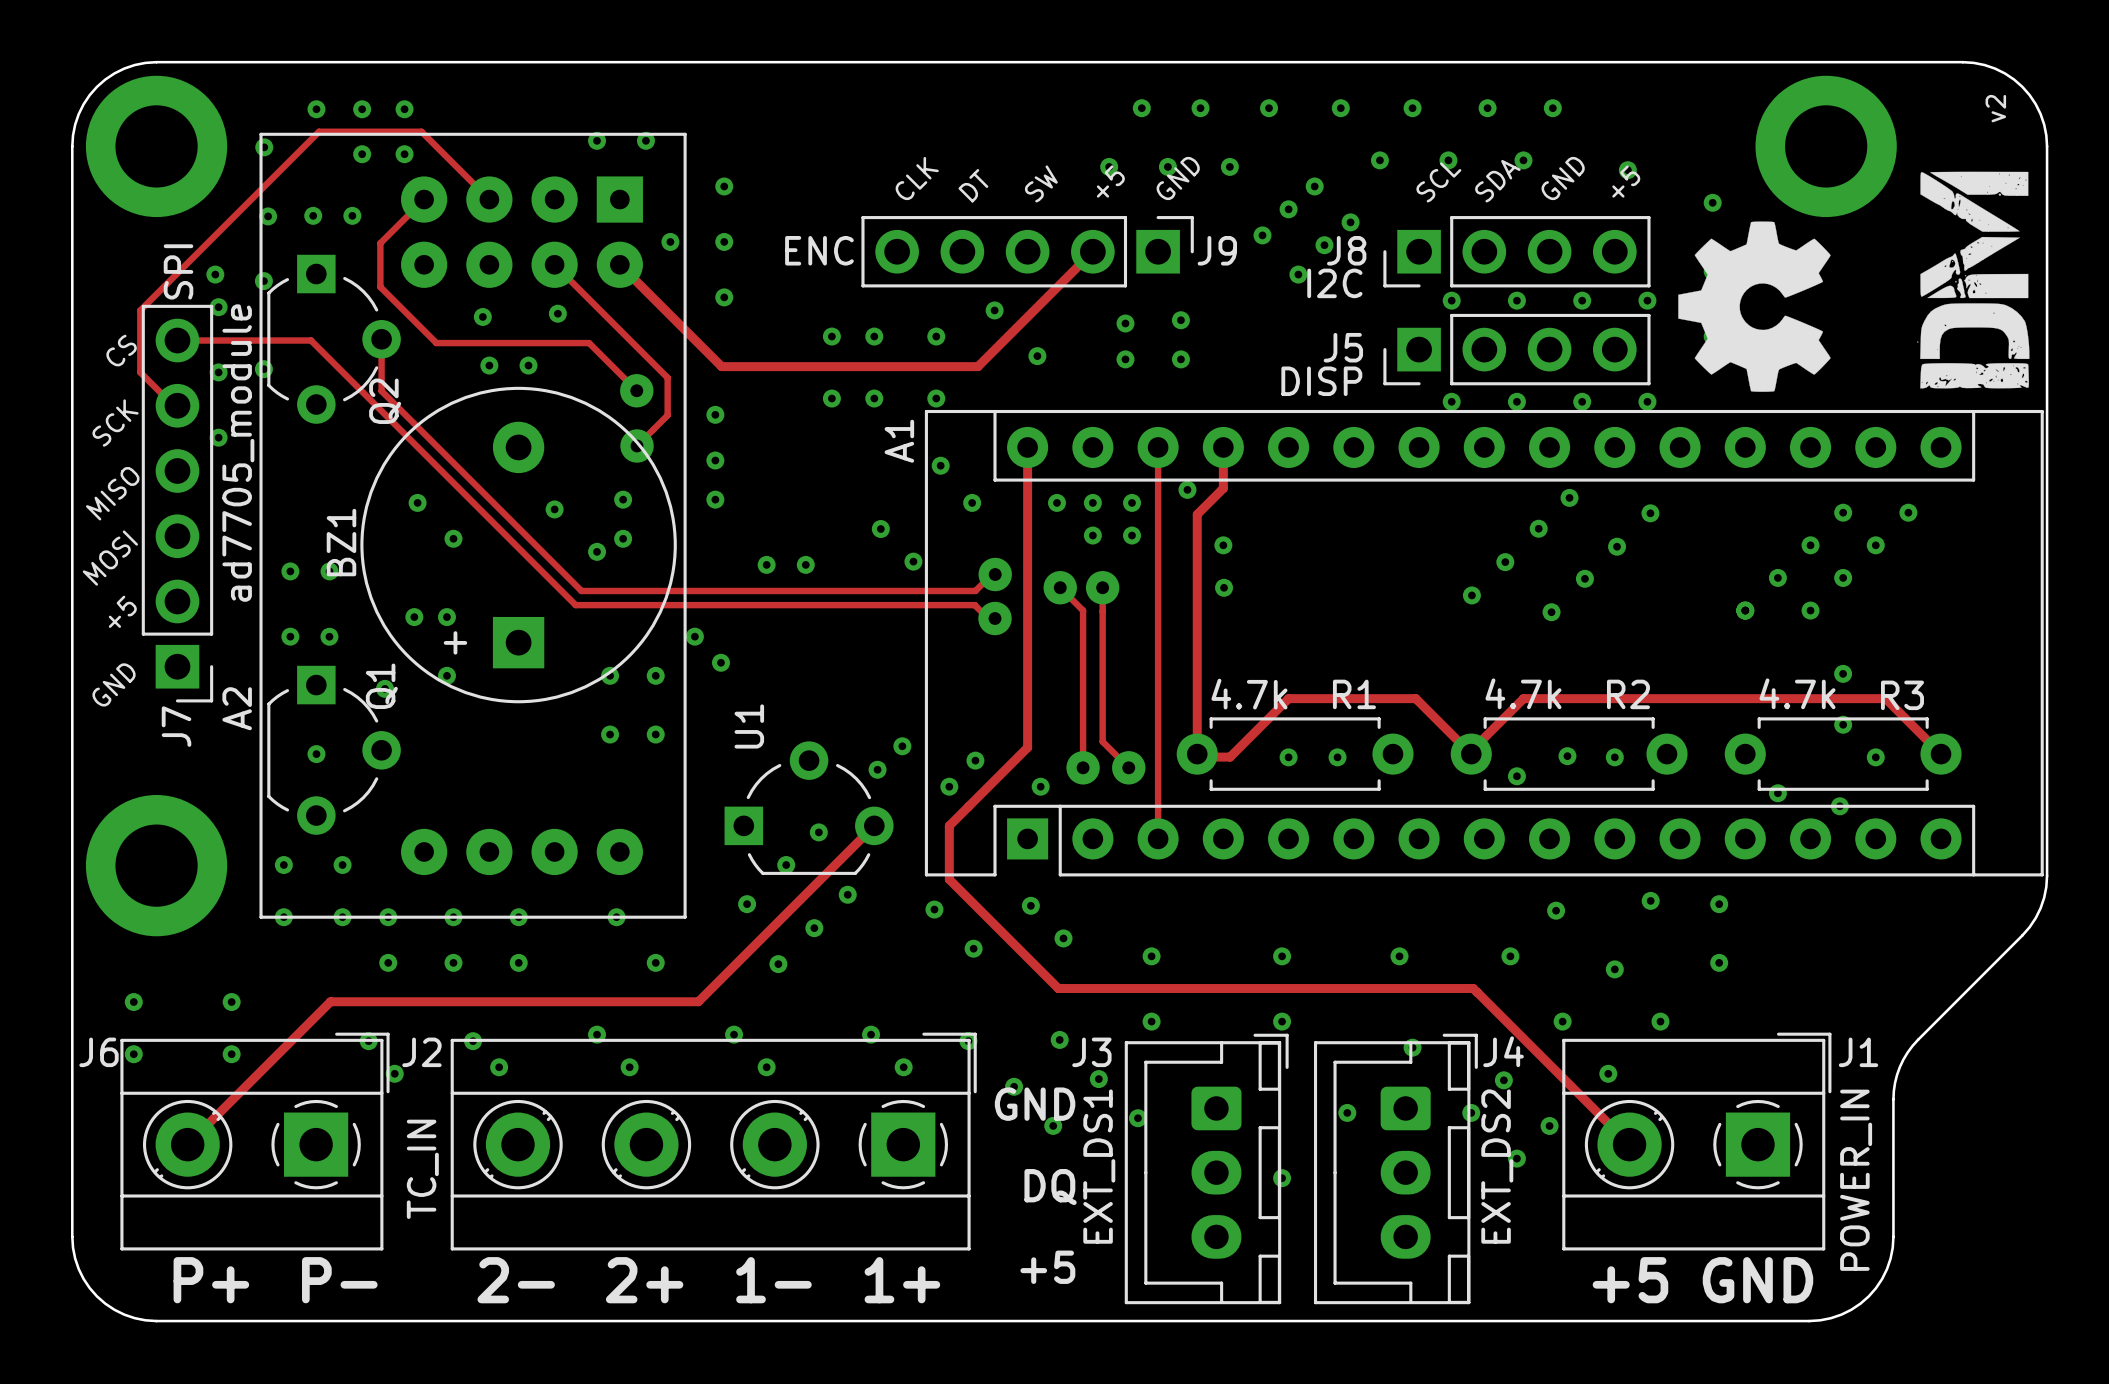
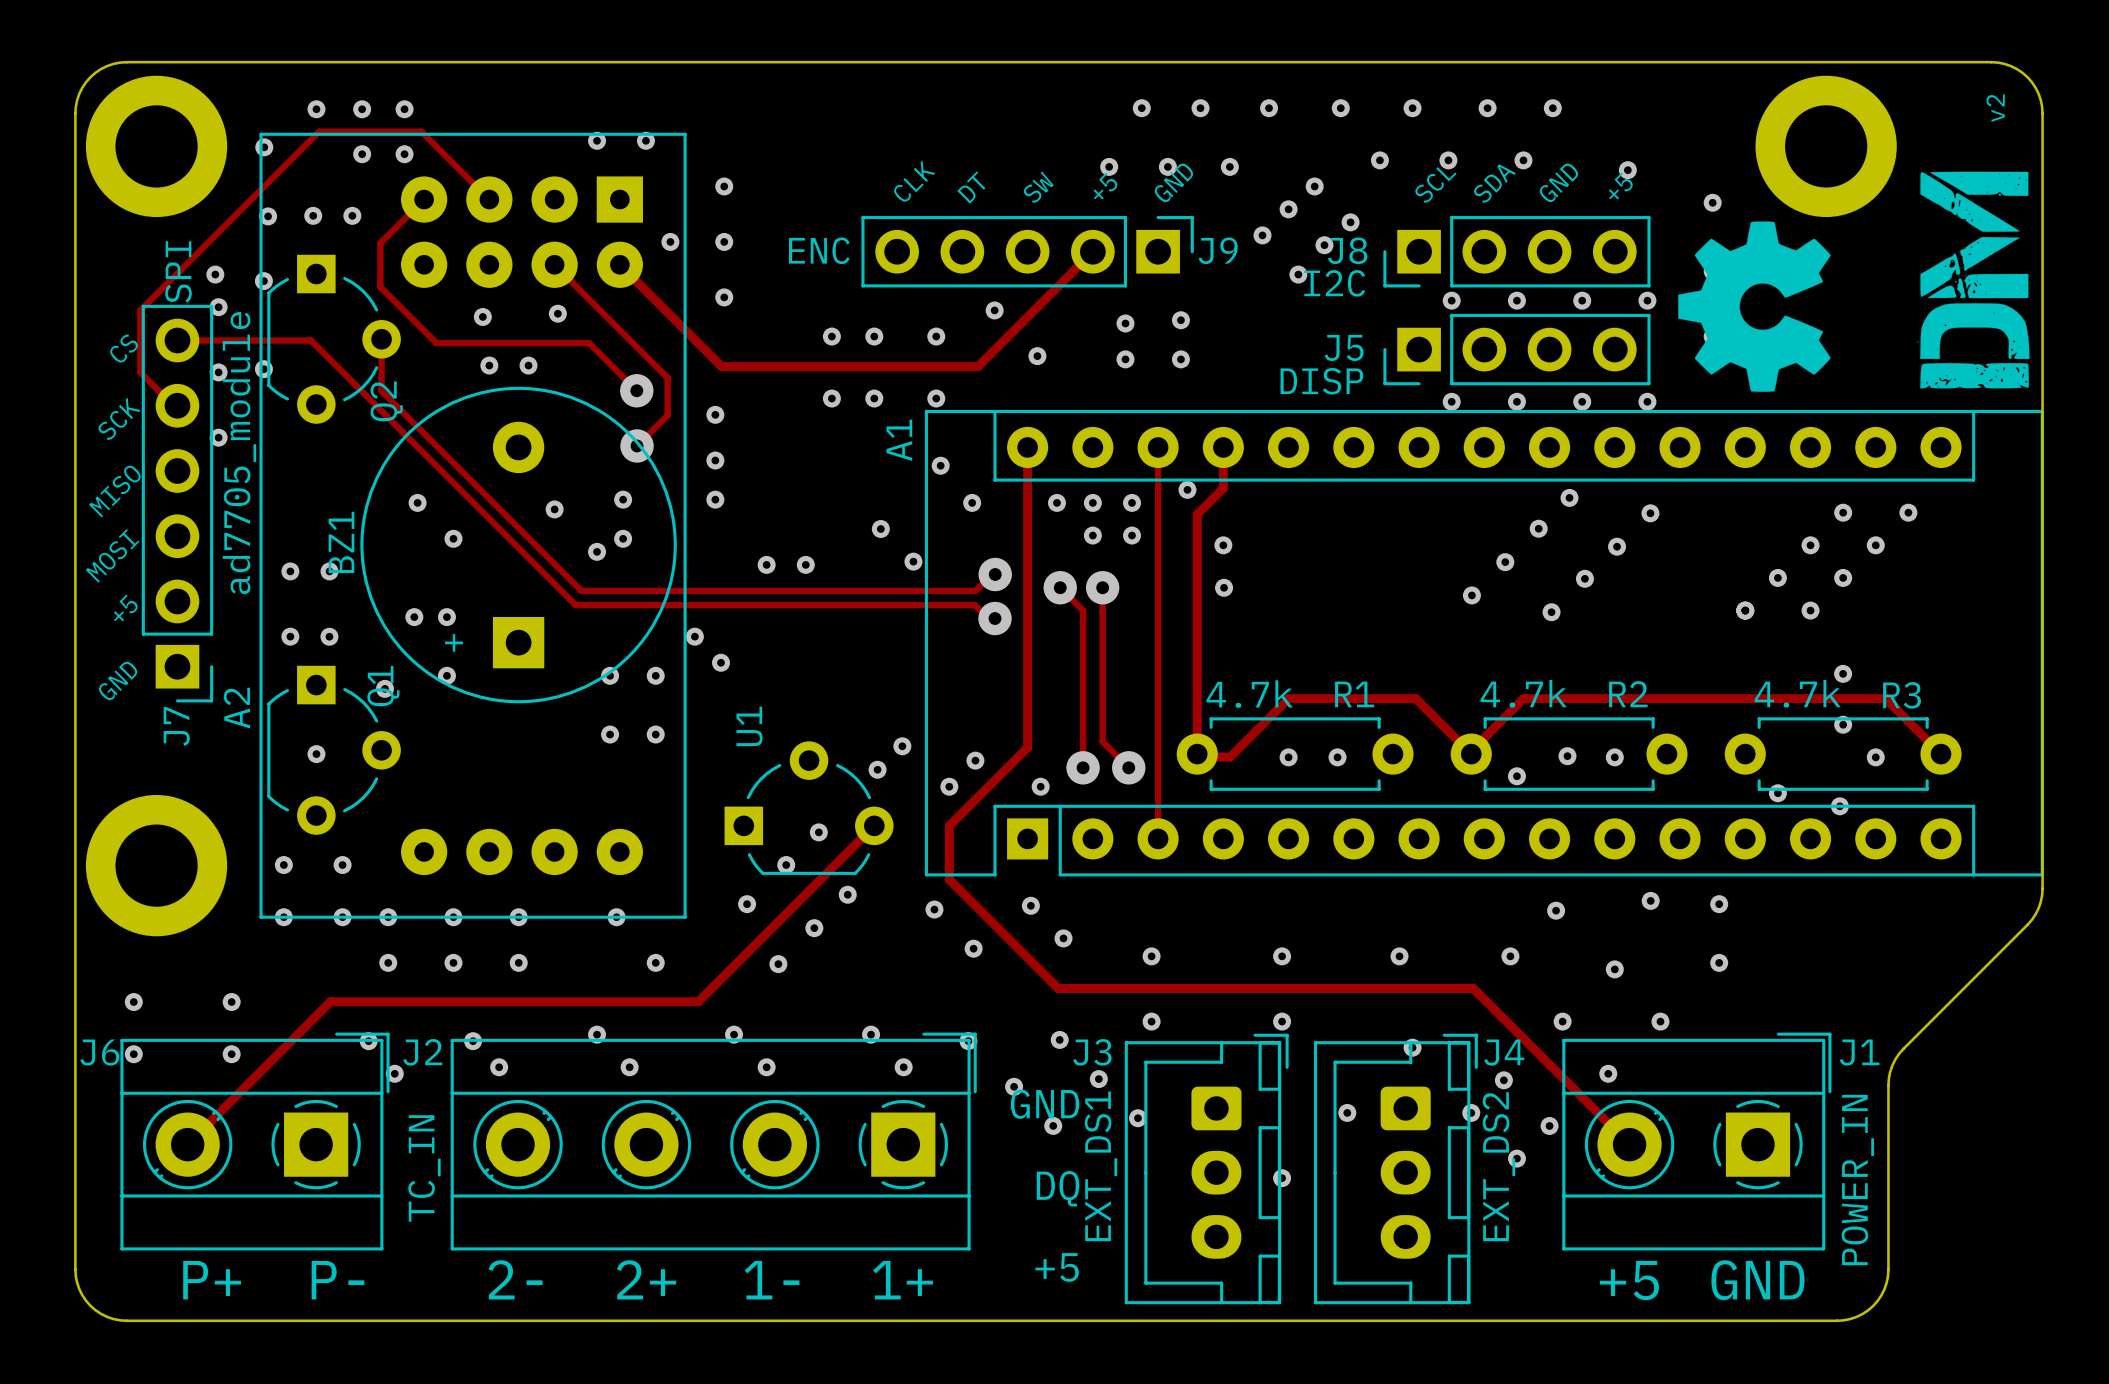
board edge: (156, 62) (124, 68) (96, 86) (78, 114) (72, 146) (72, 1236) (75, 1258) (83, 1278) (105, 1303) (134, 1318) (156, 1321) (1809, 1321) (1831, 1318) (1851, 1309) (1868, 1296) (1882, 1278) (1892, 1247) (1893, 1099) (1895, 1082) (1899, 1067) (1907, 1052) (1918, 1039) (2029, 927) (2040, 908) (2046, 886) (2046, 135) (2040, 114) (2022, 86) (1995, 68) (1962, 62) -> (156, 62) (120, 62) (101, 69) (90, 77) (82, 87) (77, 100) (75, 113) (75, 1269) (79, 1289) (90, 1305) (107, 1316) (126, 1320) (1837, 1320) (1850, 1319) (1868, 1310) (1881, 1295) (1888, 1276) (1888, 1085) (1892, 1065) (1903, 1048) (2027, 924) (2035, 914) (2042, 895) (2042, 106) (2038, 93) (2031, 82) (2016, 69) (1997, 62) (1962, 62)

